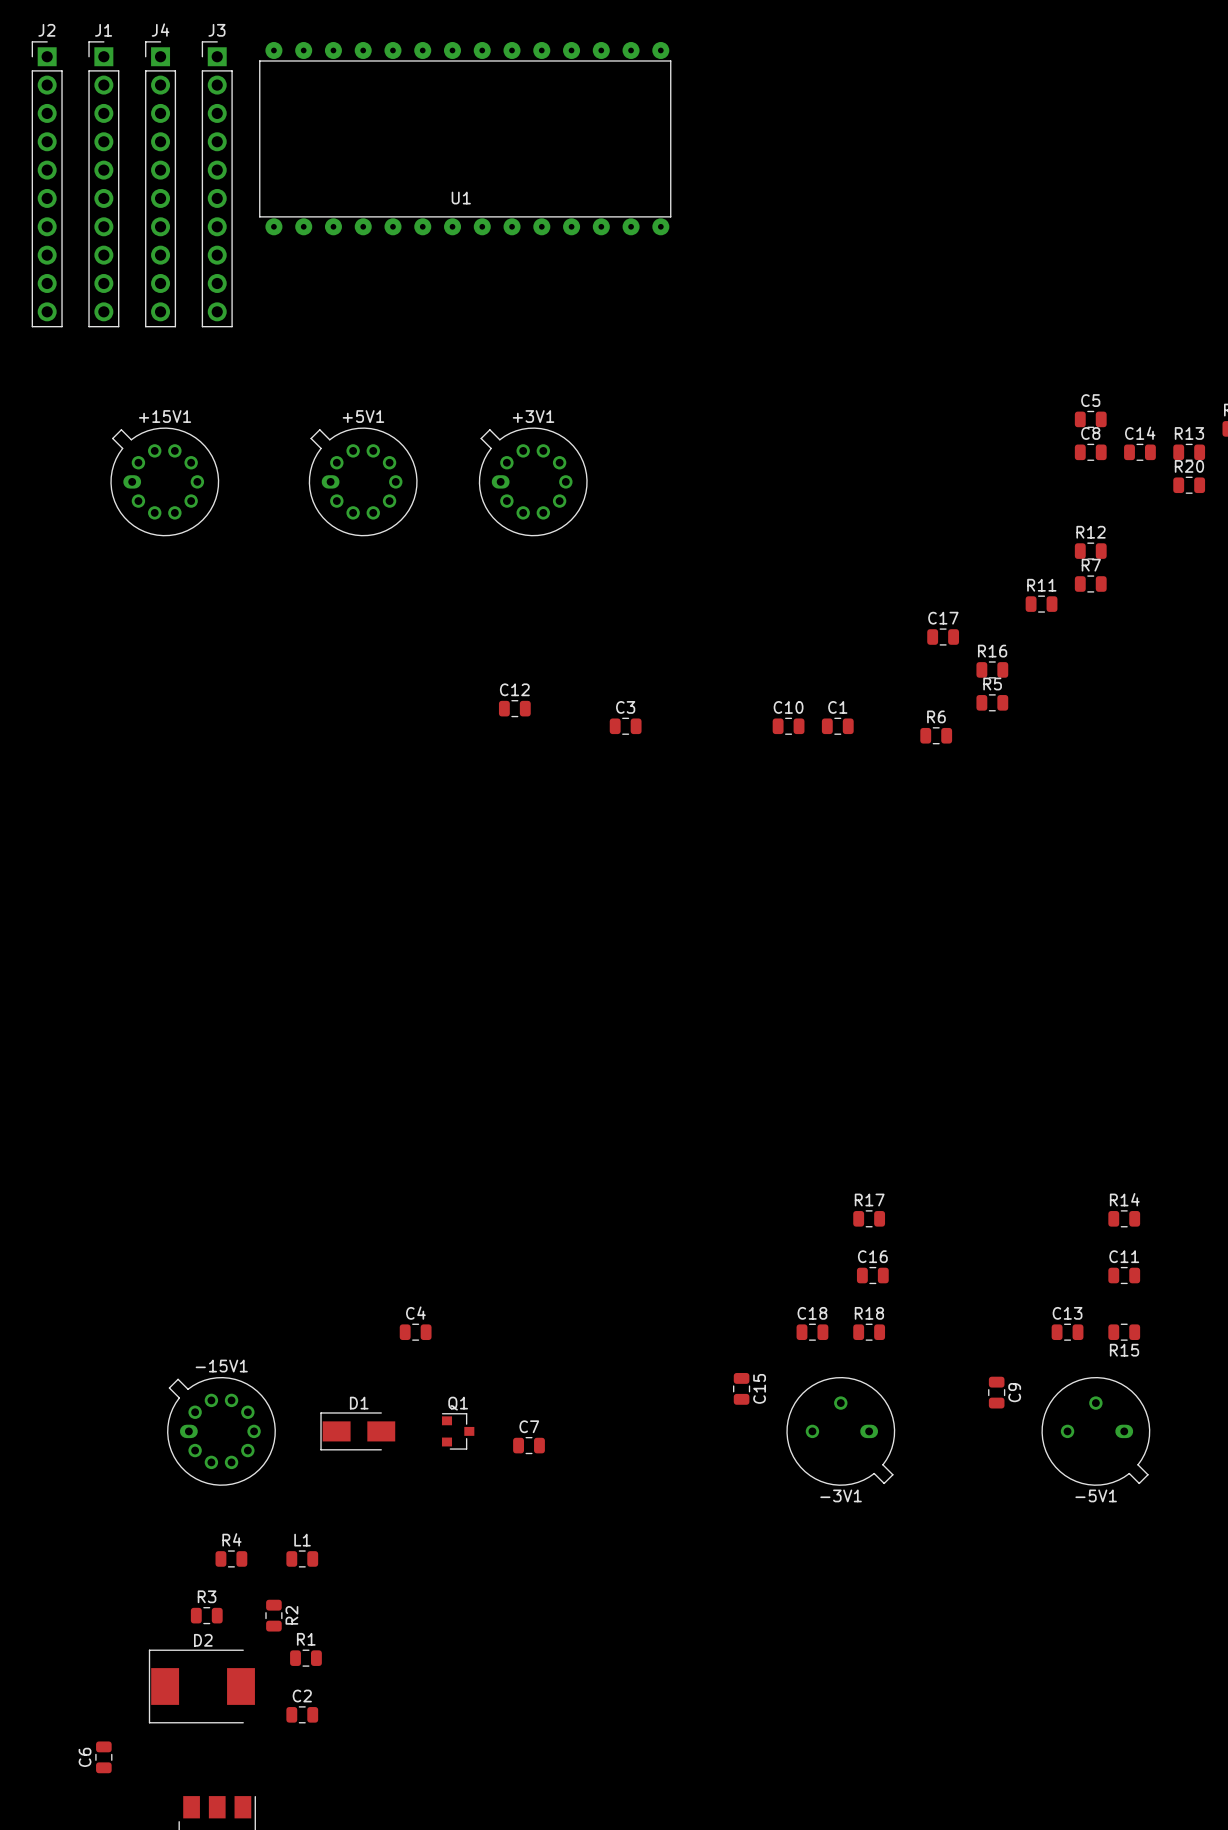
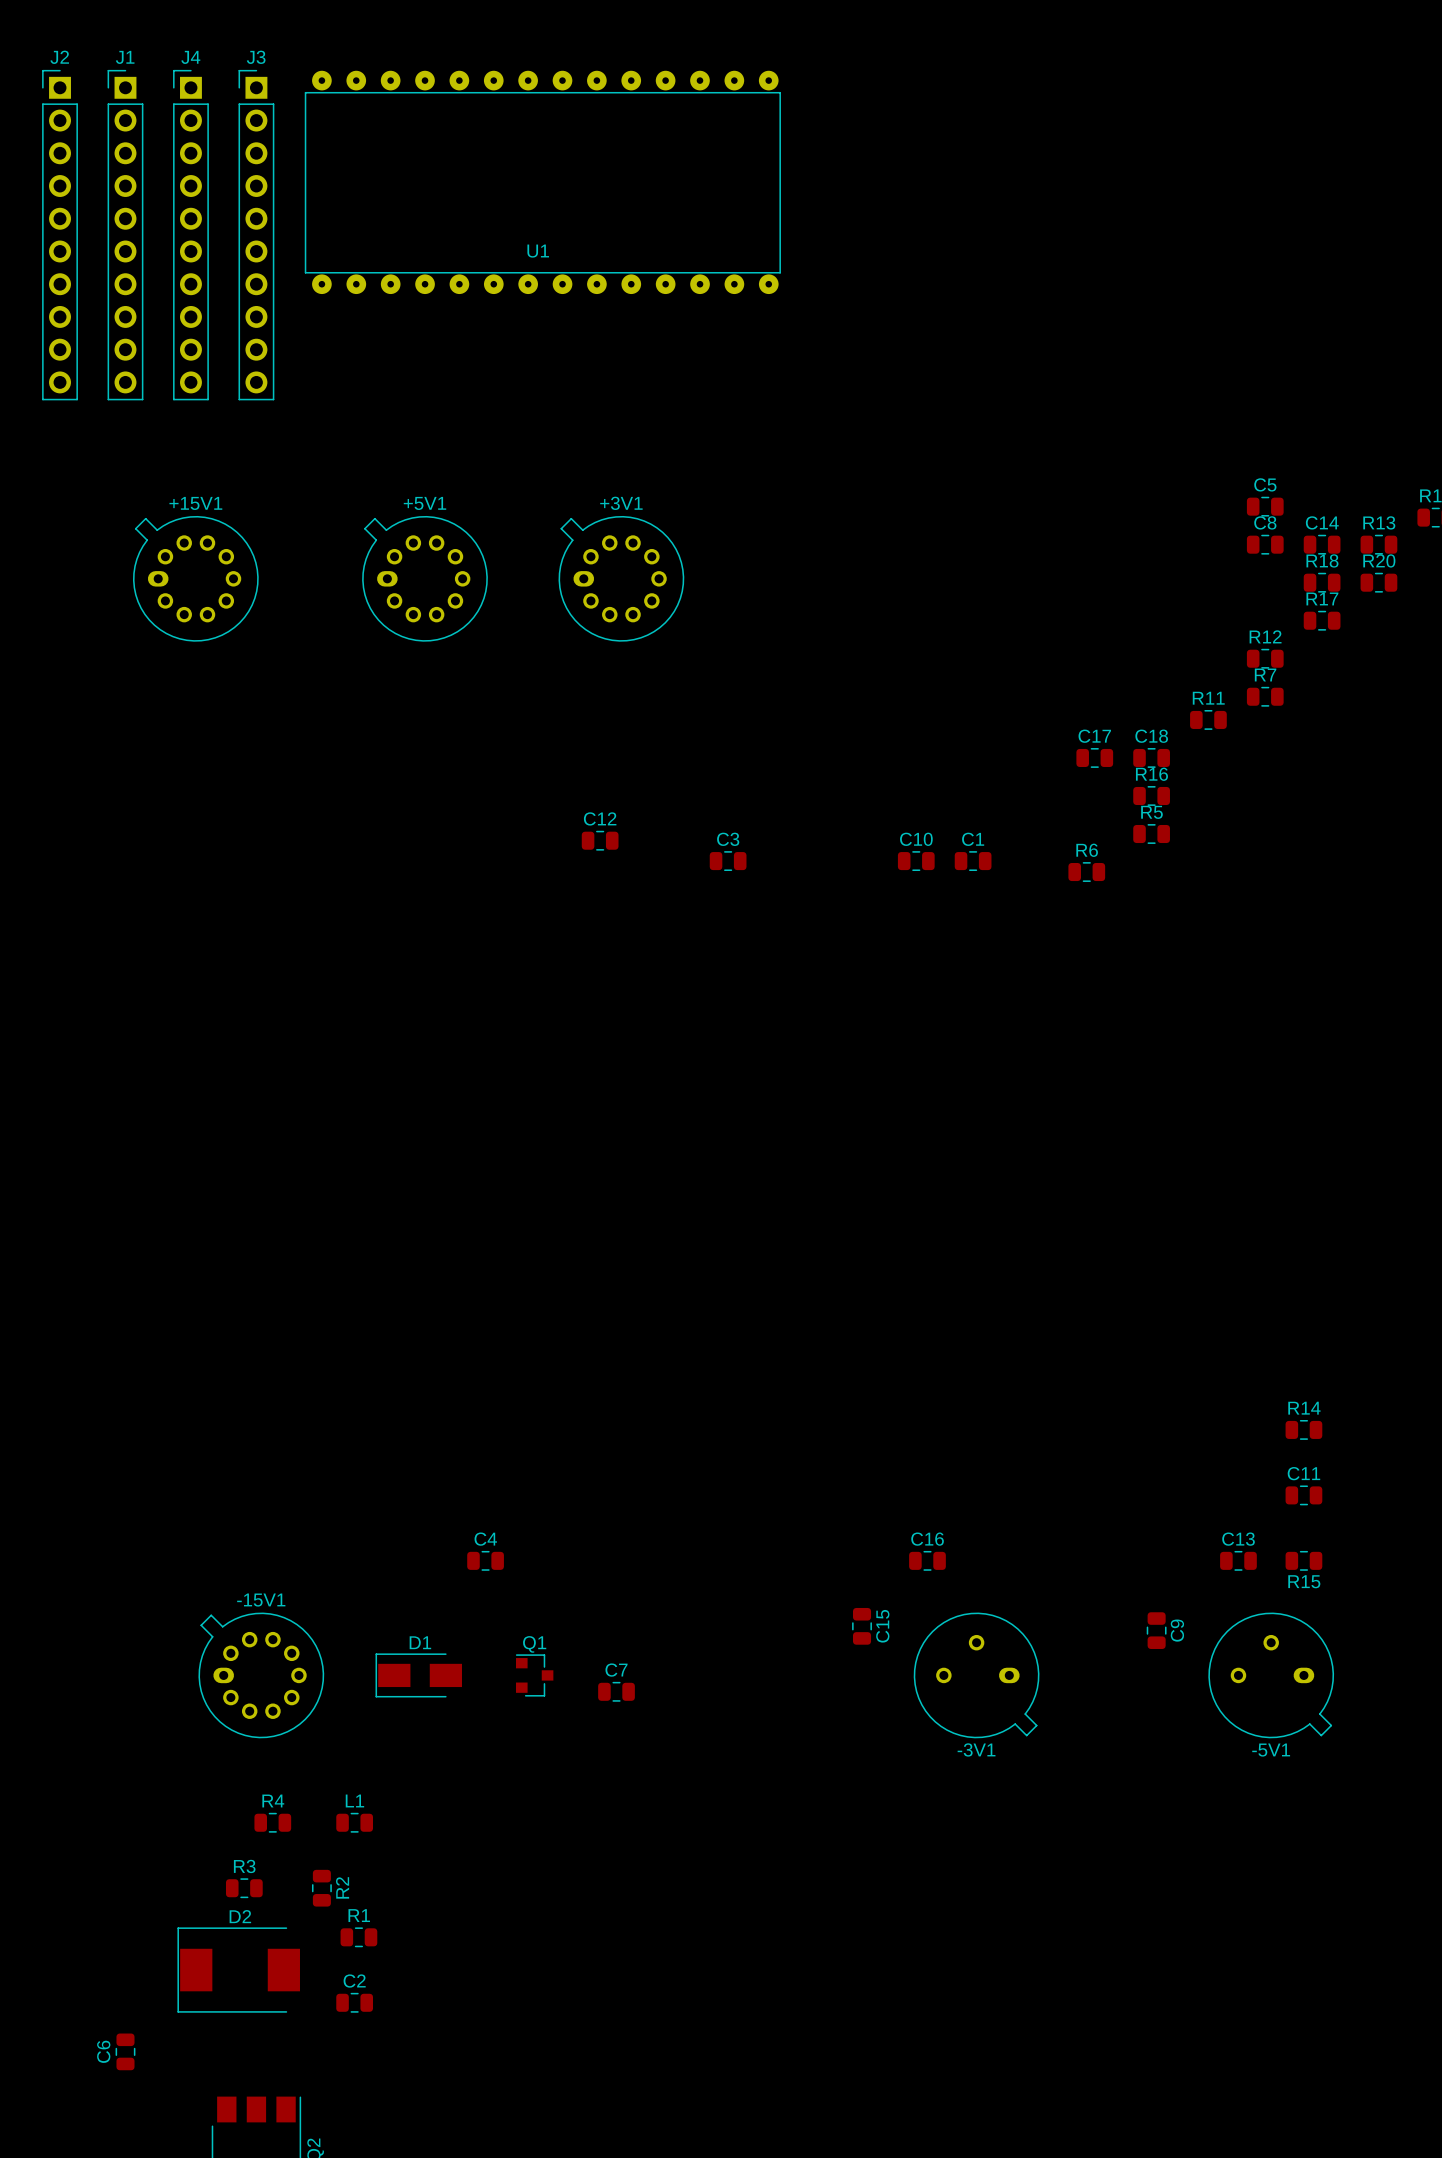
R17 position: (869, 1218) -> (1322, 620)
C16 position: (872, 1275) -> (927, 1560)
C18 position: (812, 1332) -> (1151, 757)
R18 position: (869, 1332) -> (1322, 582)

